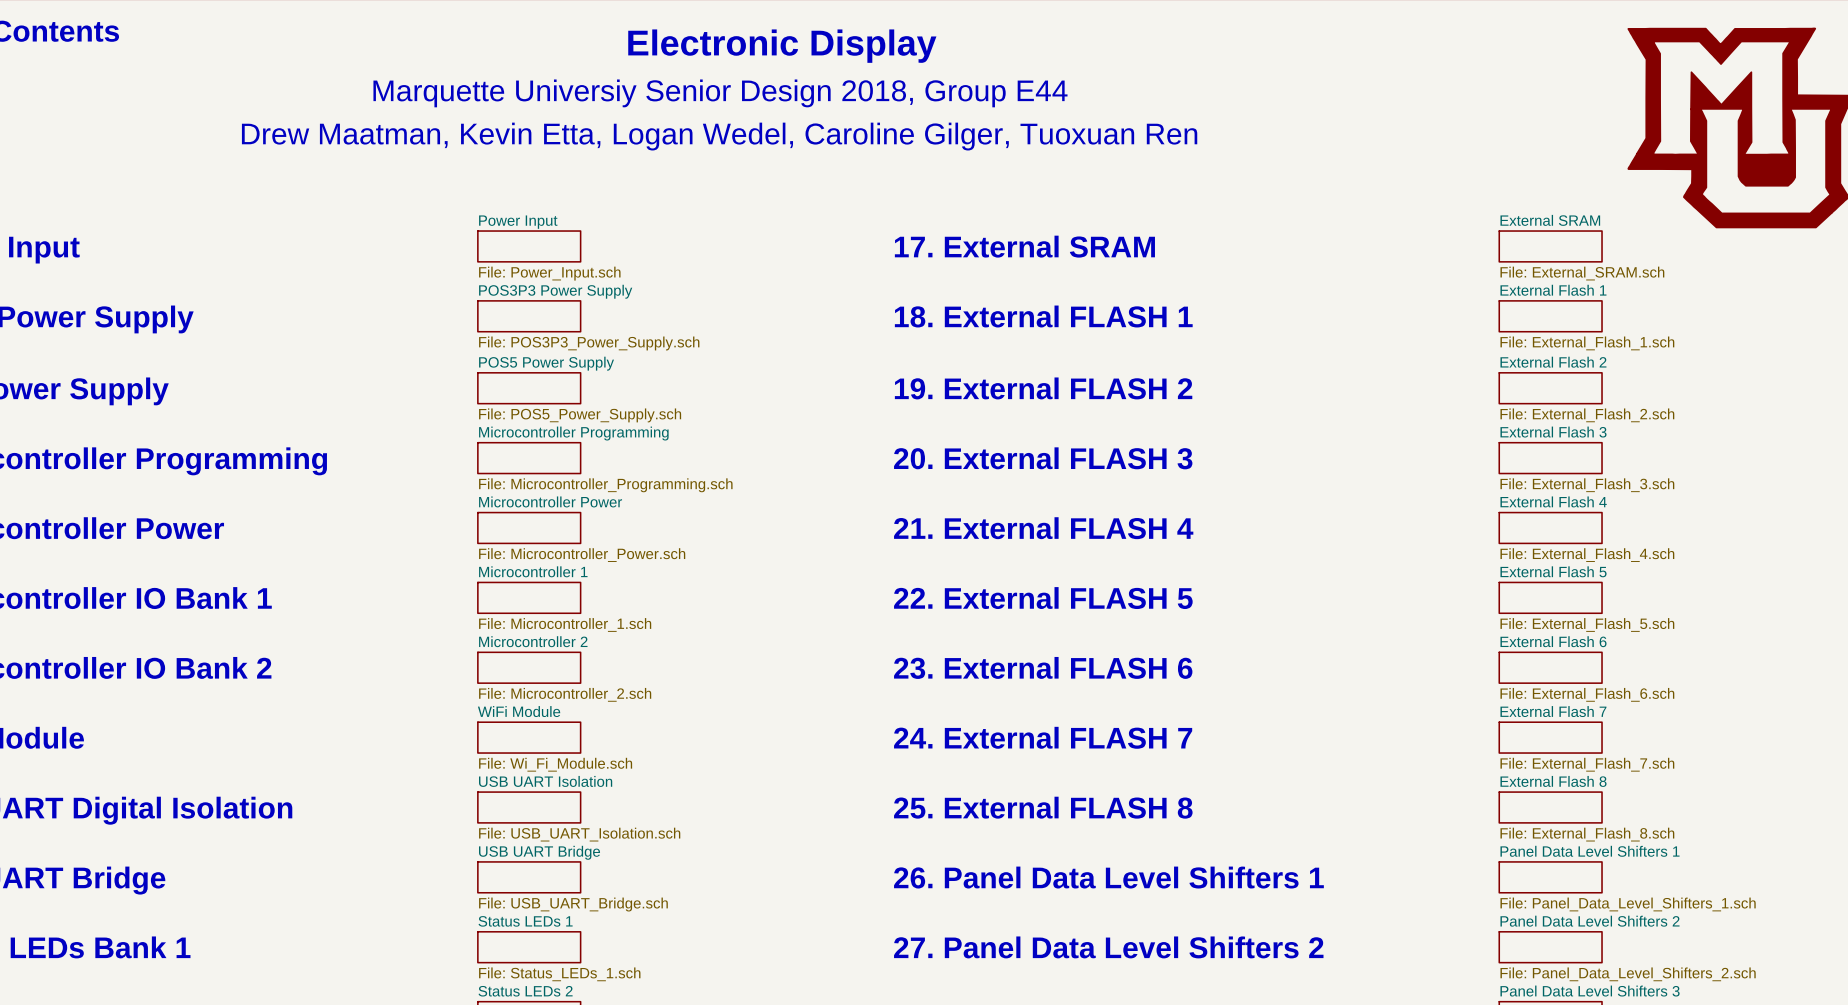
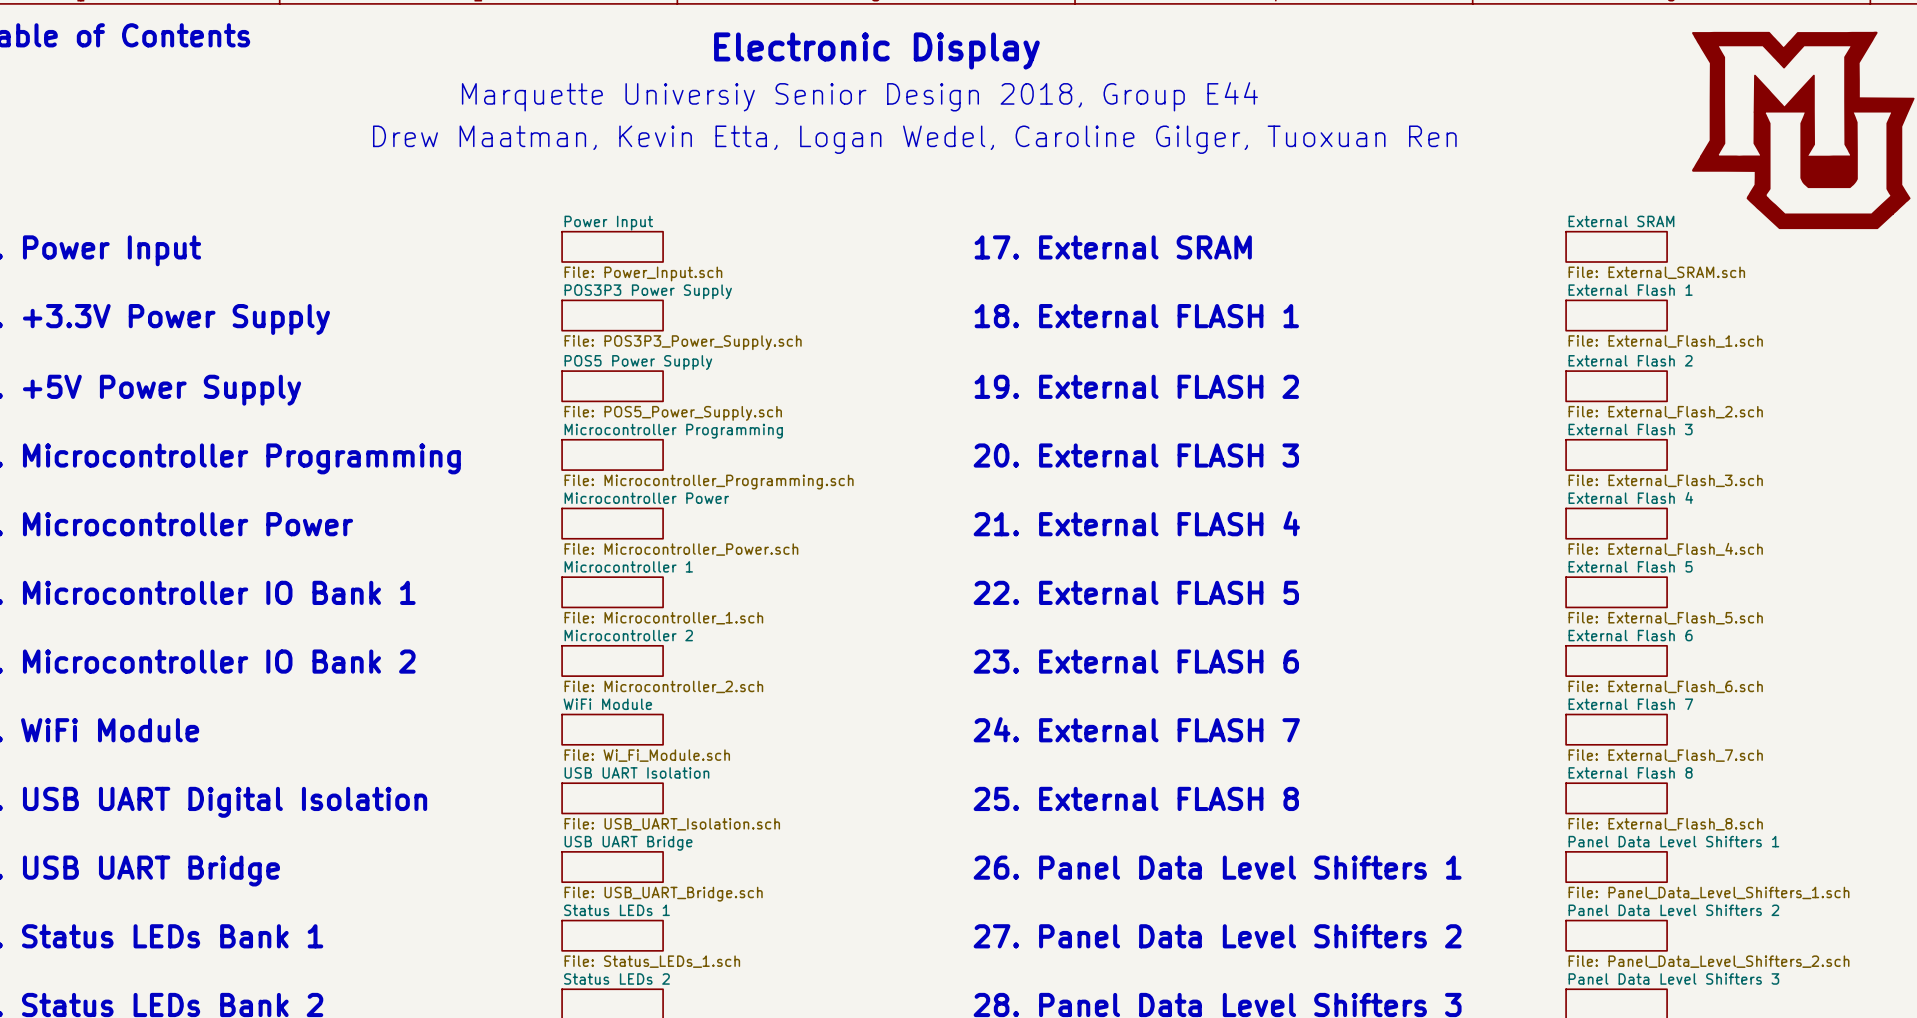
text position: Drew Maatman, Kevin Etta, Logan Wedel, Caroline Gilger, Tuoxuan Ren (719, 136) -> Drew Maatman, Kevin Etta, Logan Wedel, Caroline Gilger, Tuoxuan Ren (914, 139)

